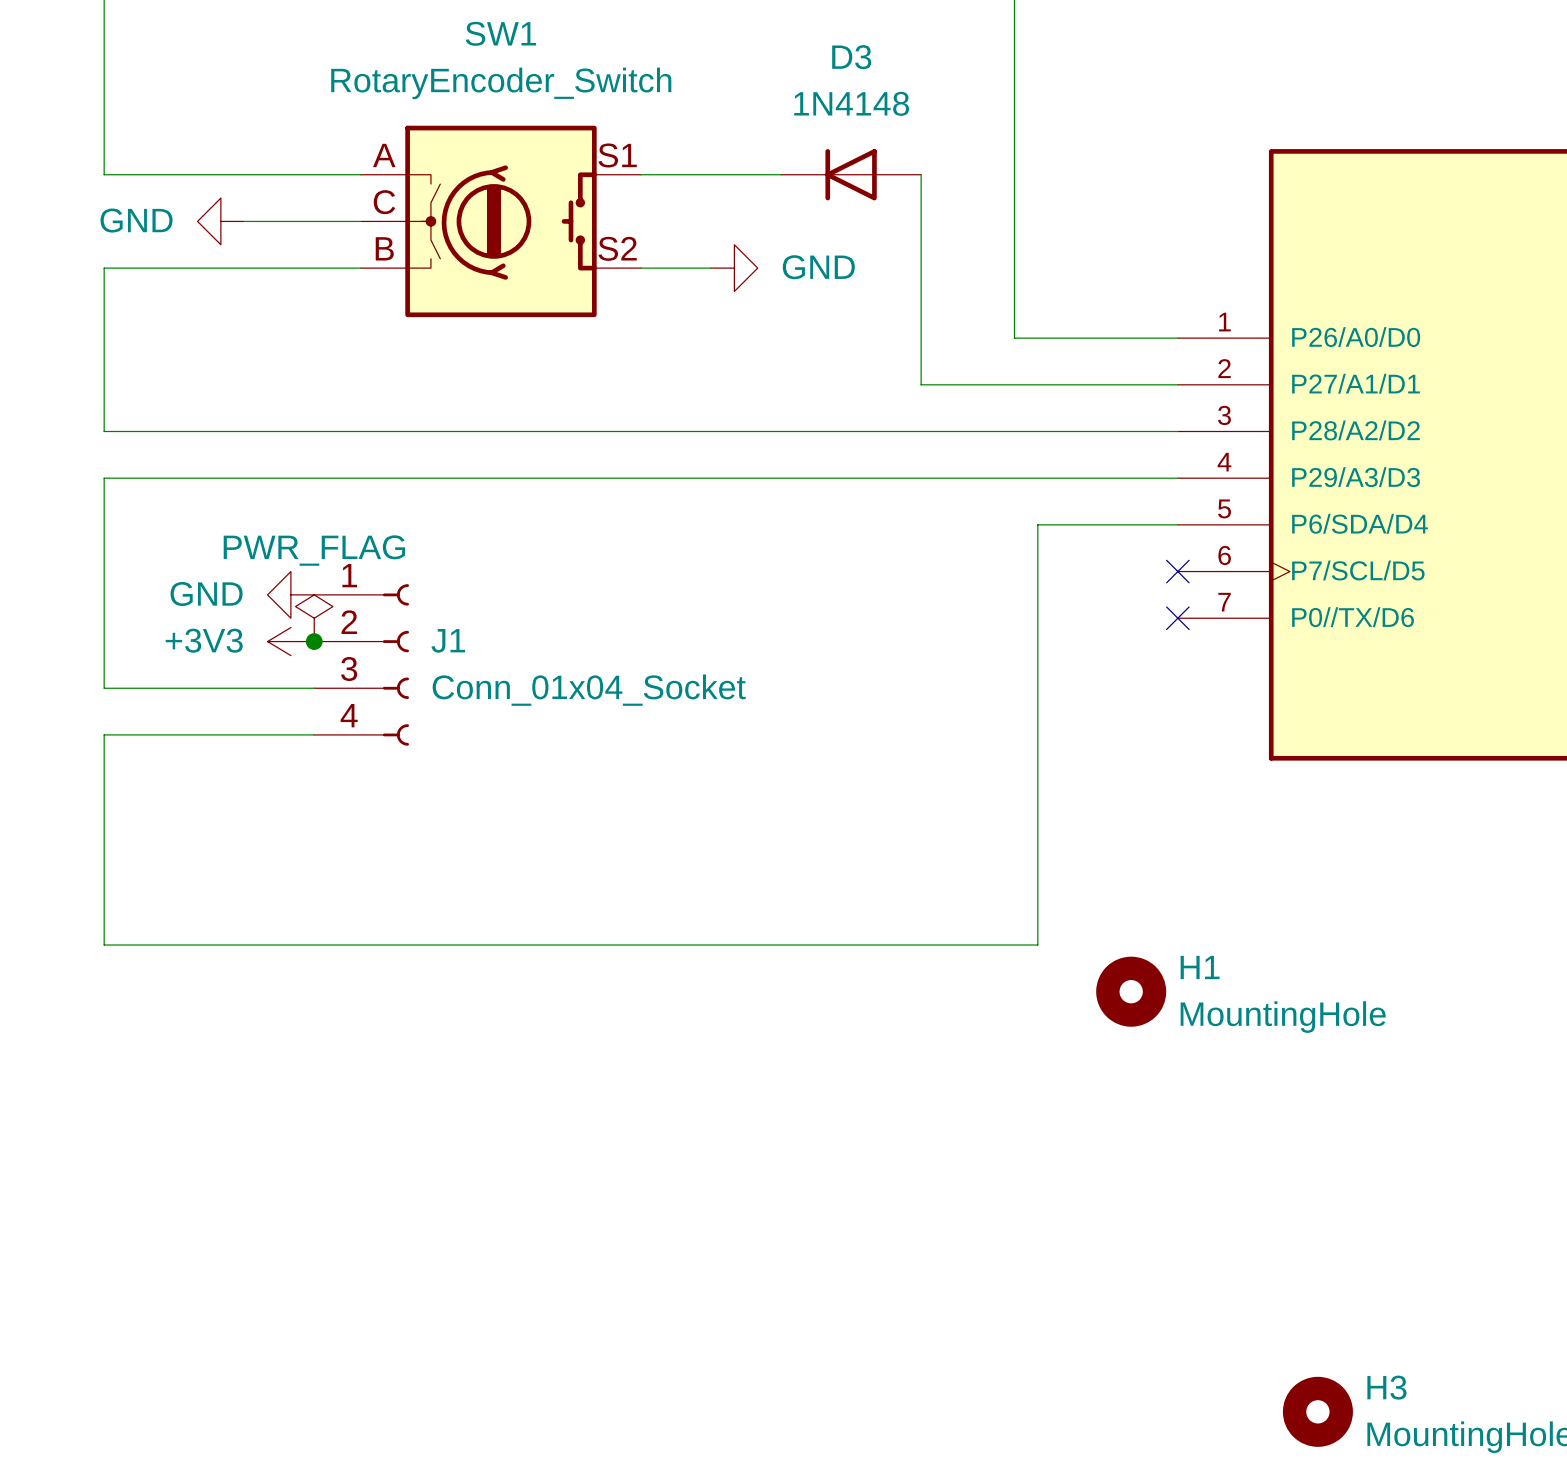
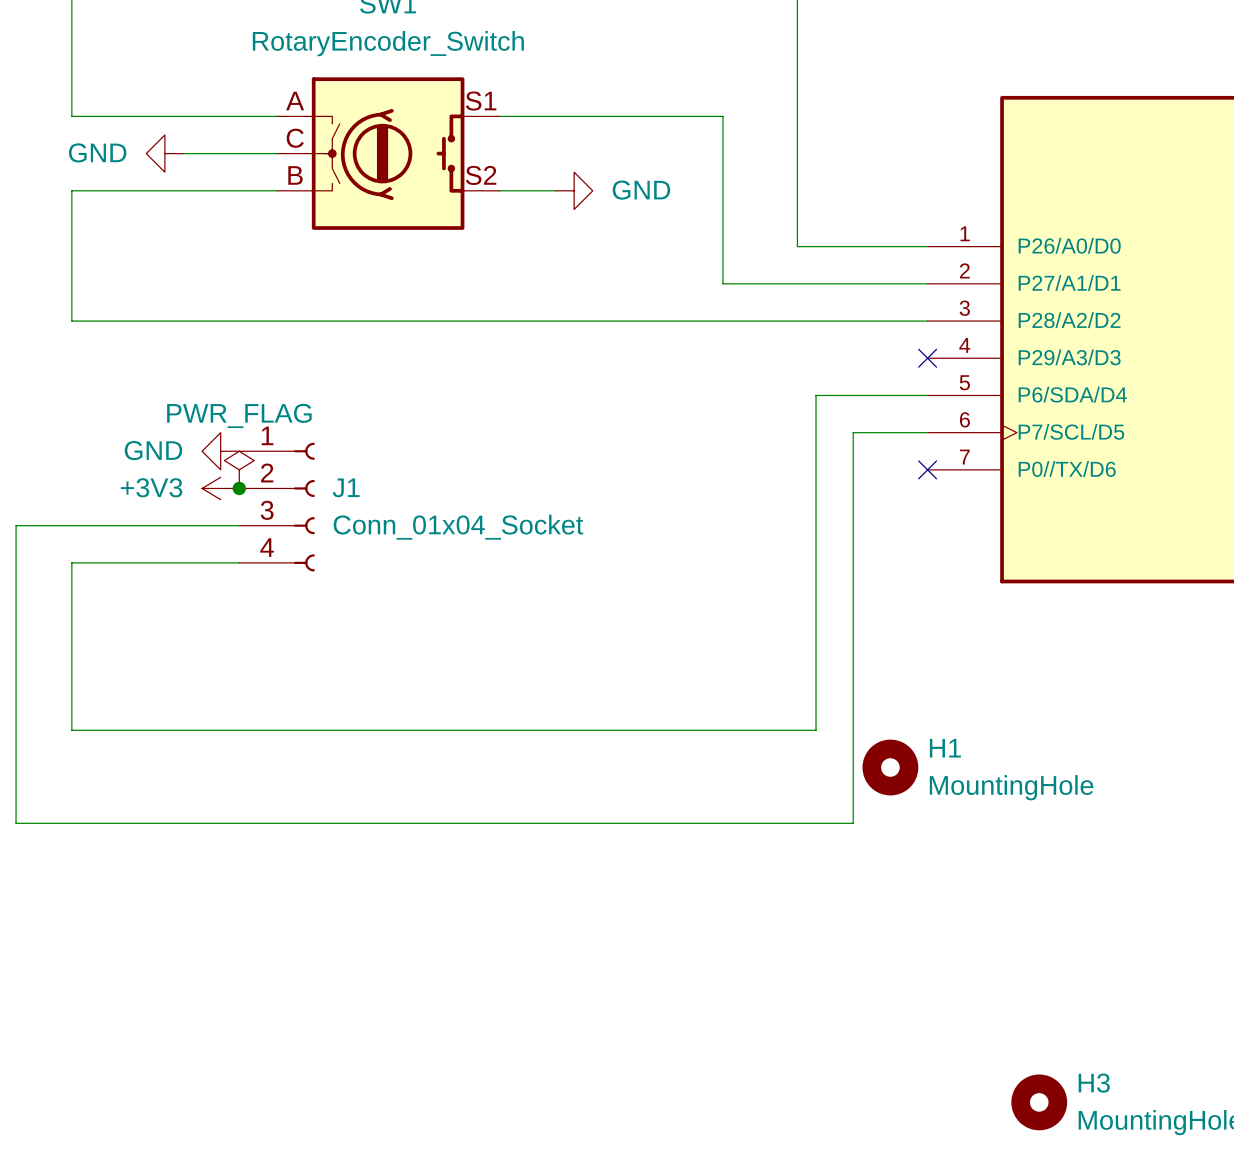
D3: 1N4148 (851, 174) -> none
wire: (1177, 478) (104, 478) (104, 688) -> (927, 432) (853, 432) (853, 823) (16, 823) (16, 525) (71, 525)
no-connect mark position: (1177, 571) -> (927, 358)

